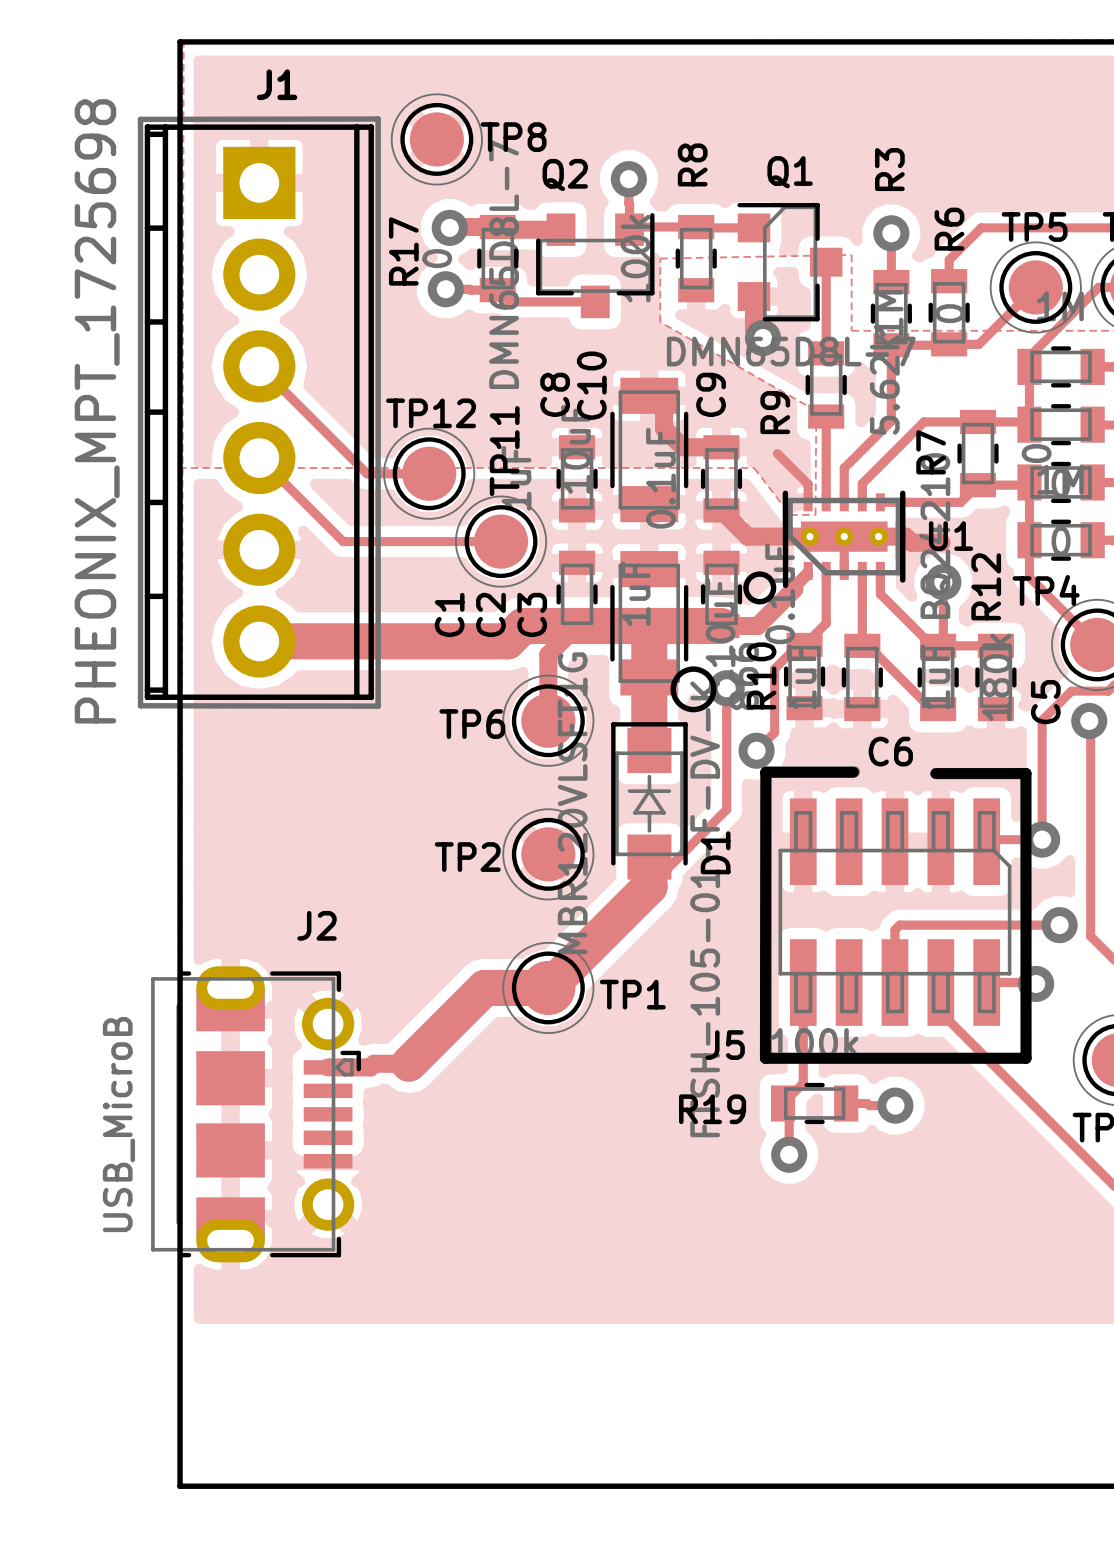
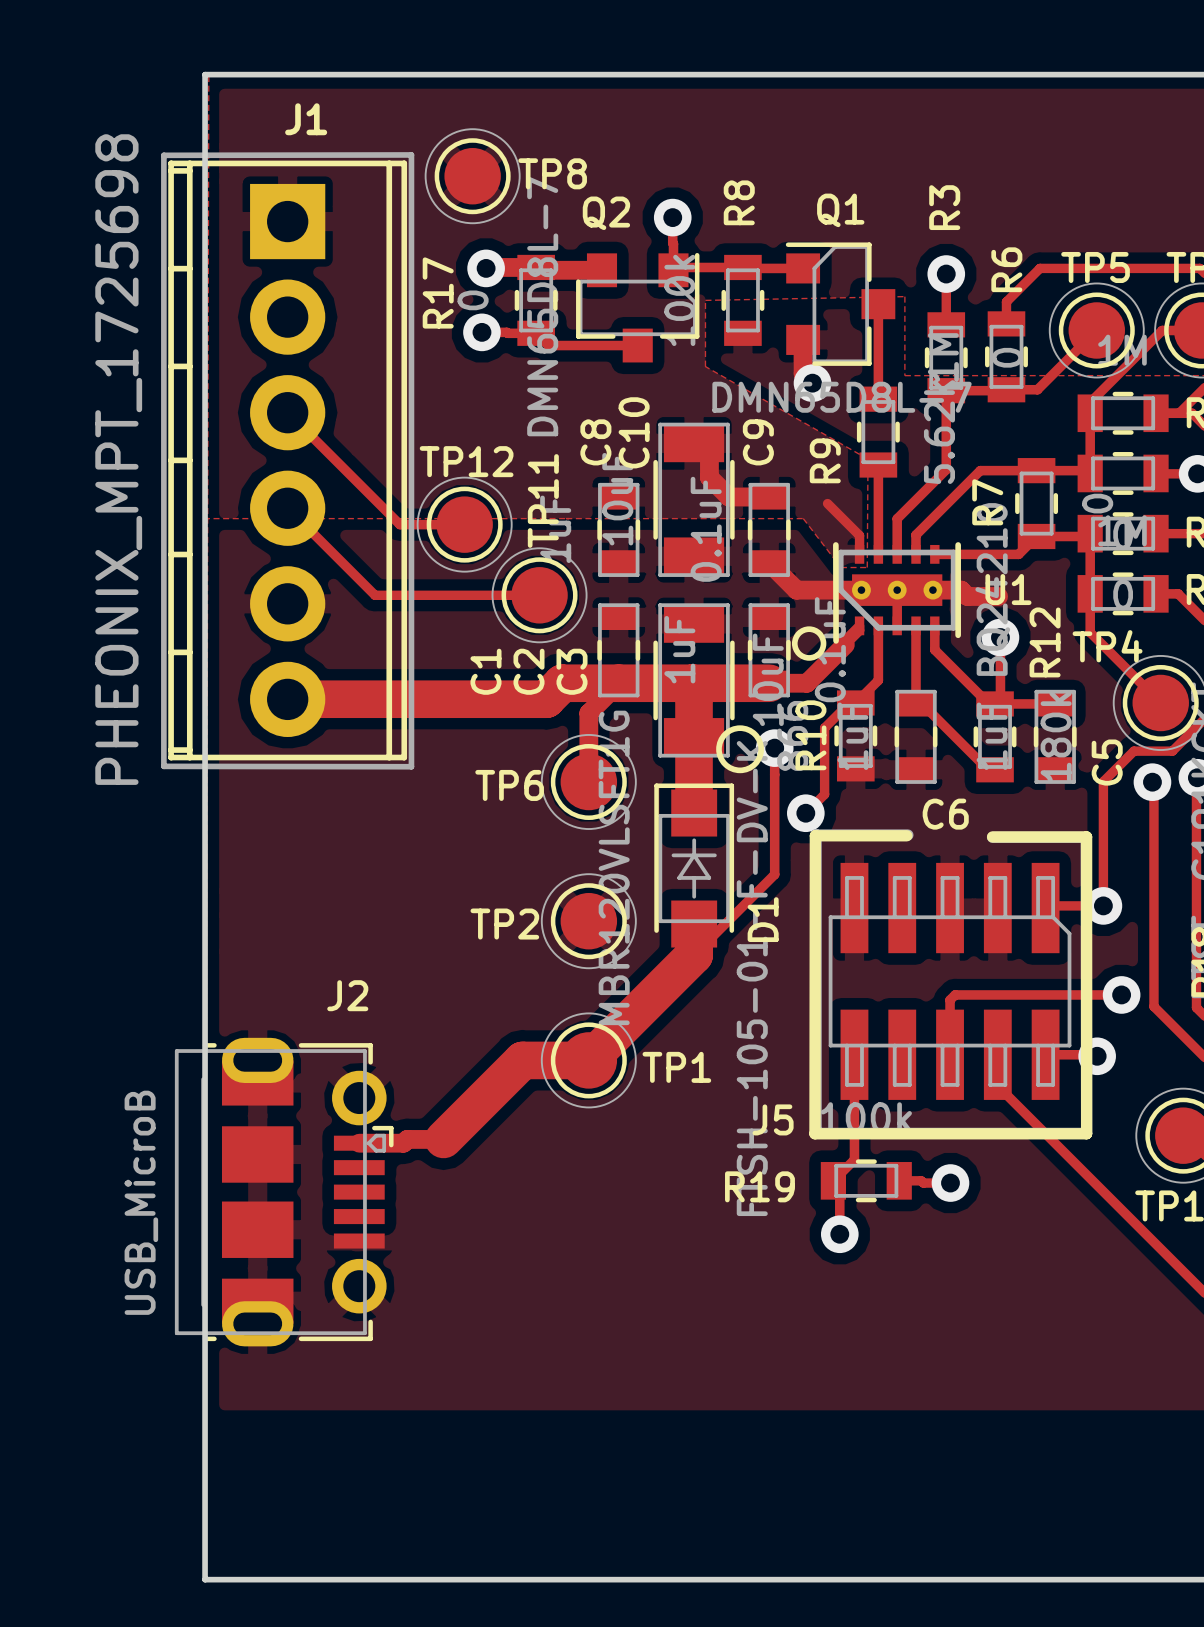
C10 footprint: [610, 377, 689, 523] -> [653, 422, 735, 577]
C8 footprint: [556, 435, 598, 523] -> [597, 482, 641, 577]
C9 footprint: [700, 435, 743, 523] -> [747, 482, 791, 577]
C1 footprint: [556, 550, 598, 639] -> [597, 603, 641, 698]
C3 footprint: [700, 550, 743, 639] -> [747, 603, 791, 698]
C2 footprint: [610, 551, 689, 696] -> [653, 603, 735, 758]
C6 footprint: [841, 633, 883, 722] -> [894, 689, 938, 784]
C5 footprint: [975, 633, 1017, 722] -> [1033, 689, 1077, 784]

